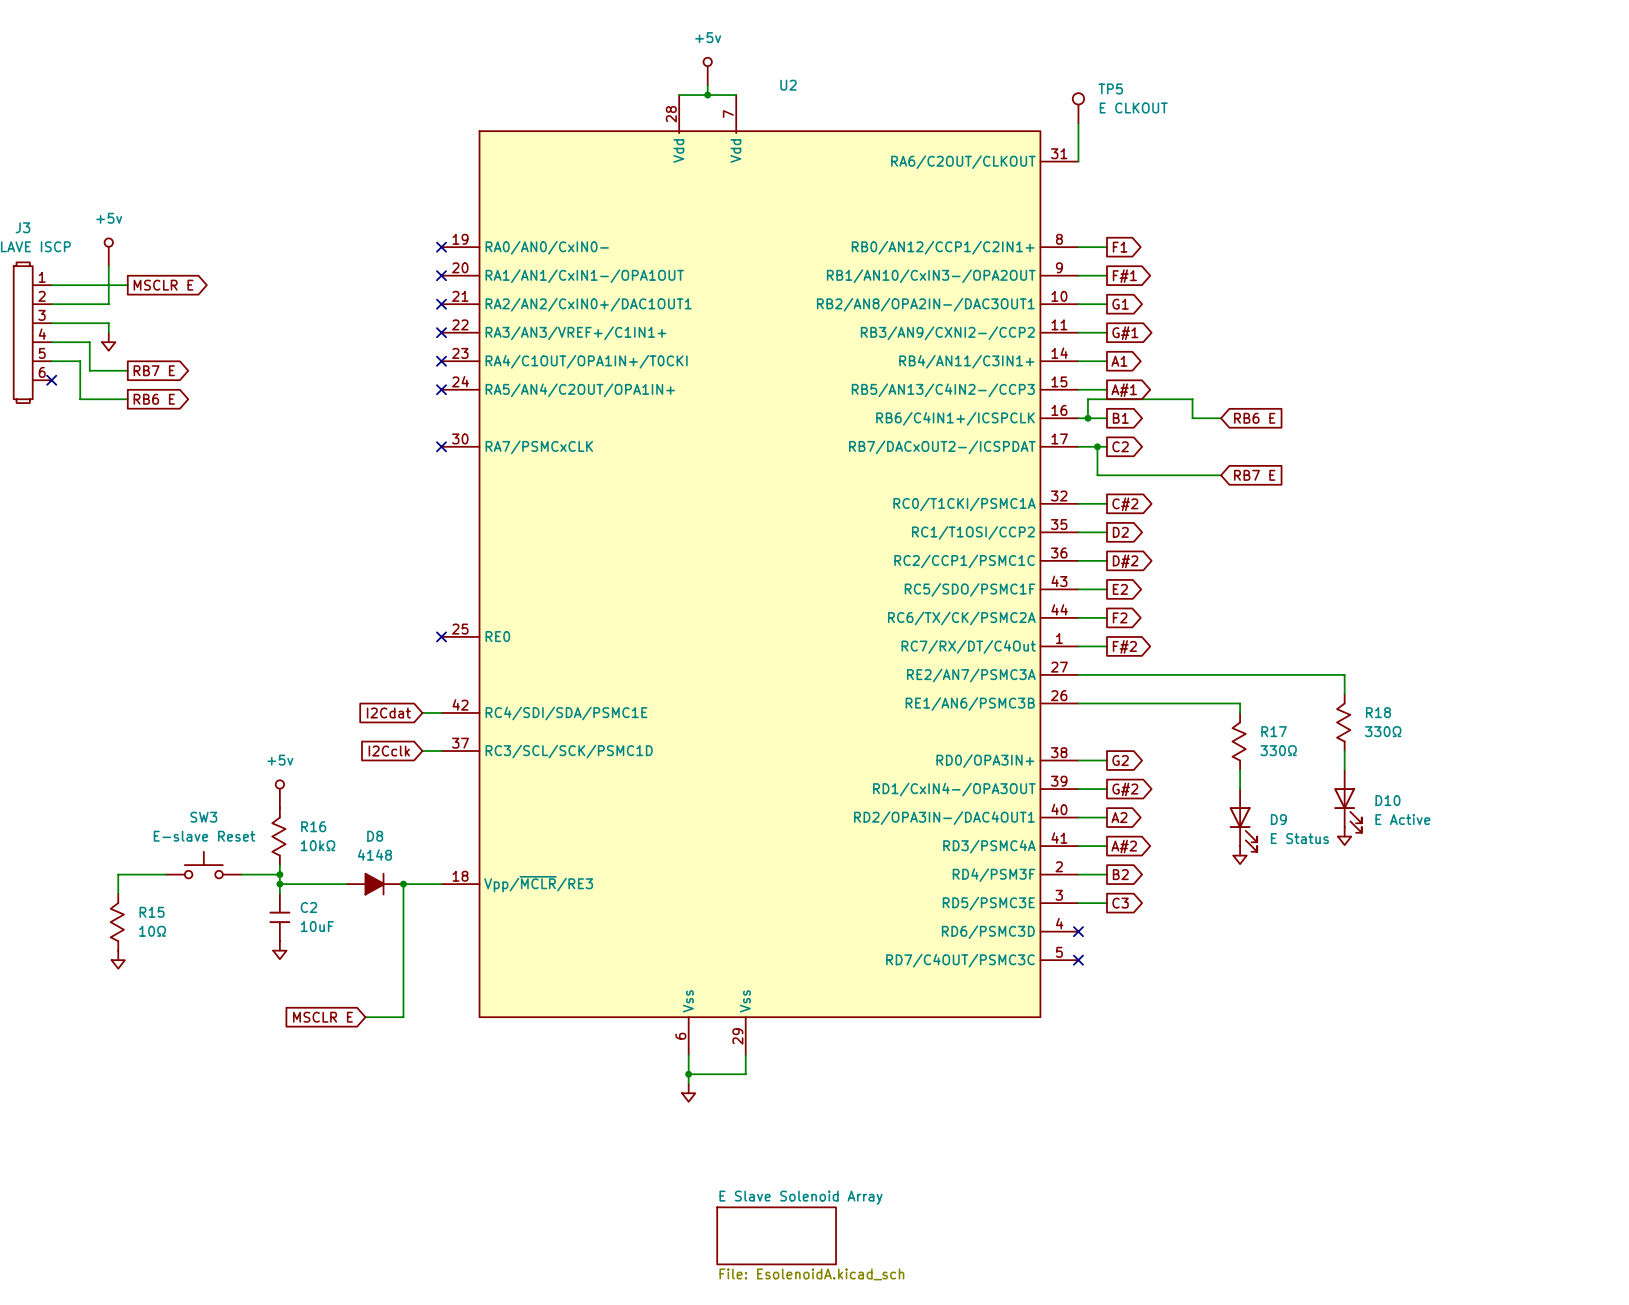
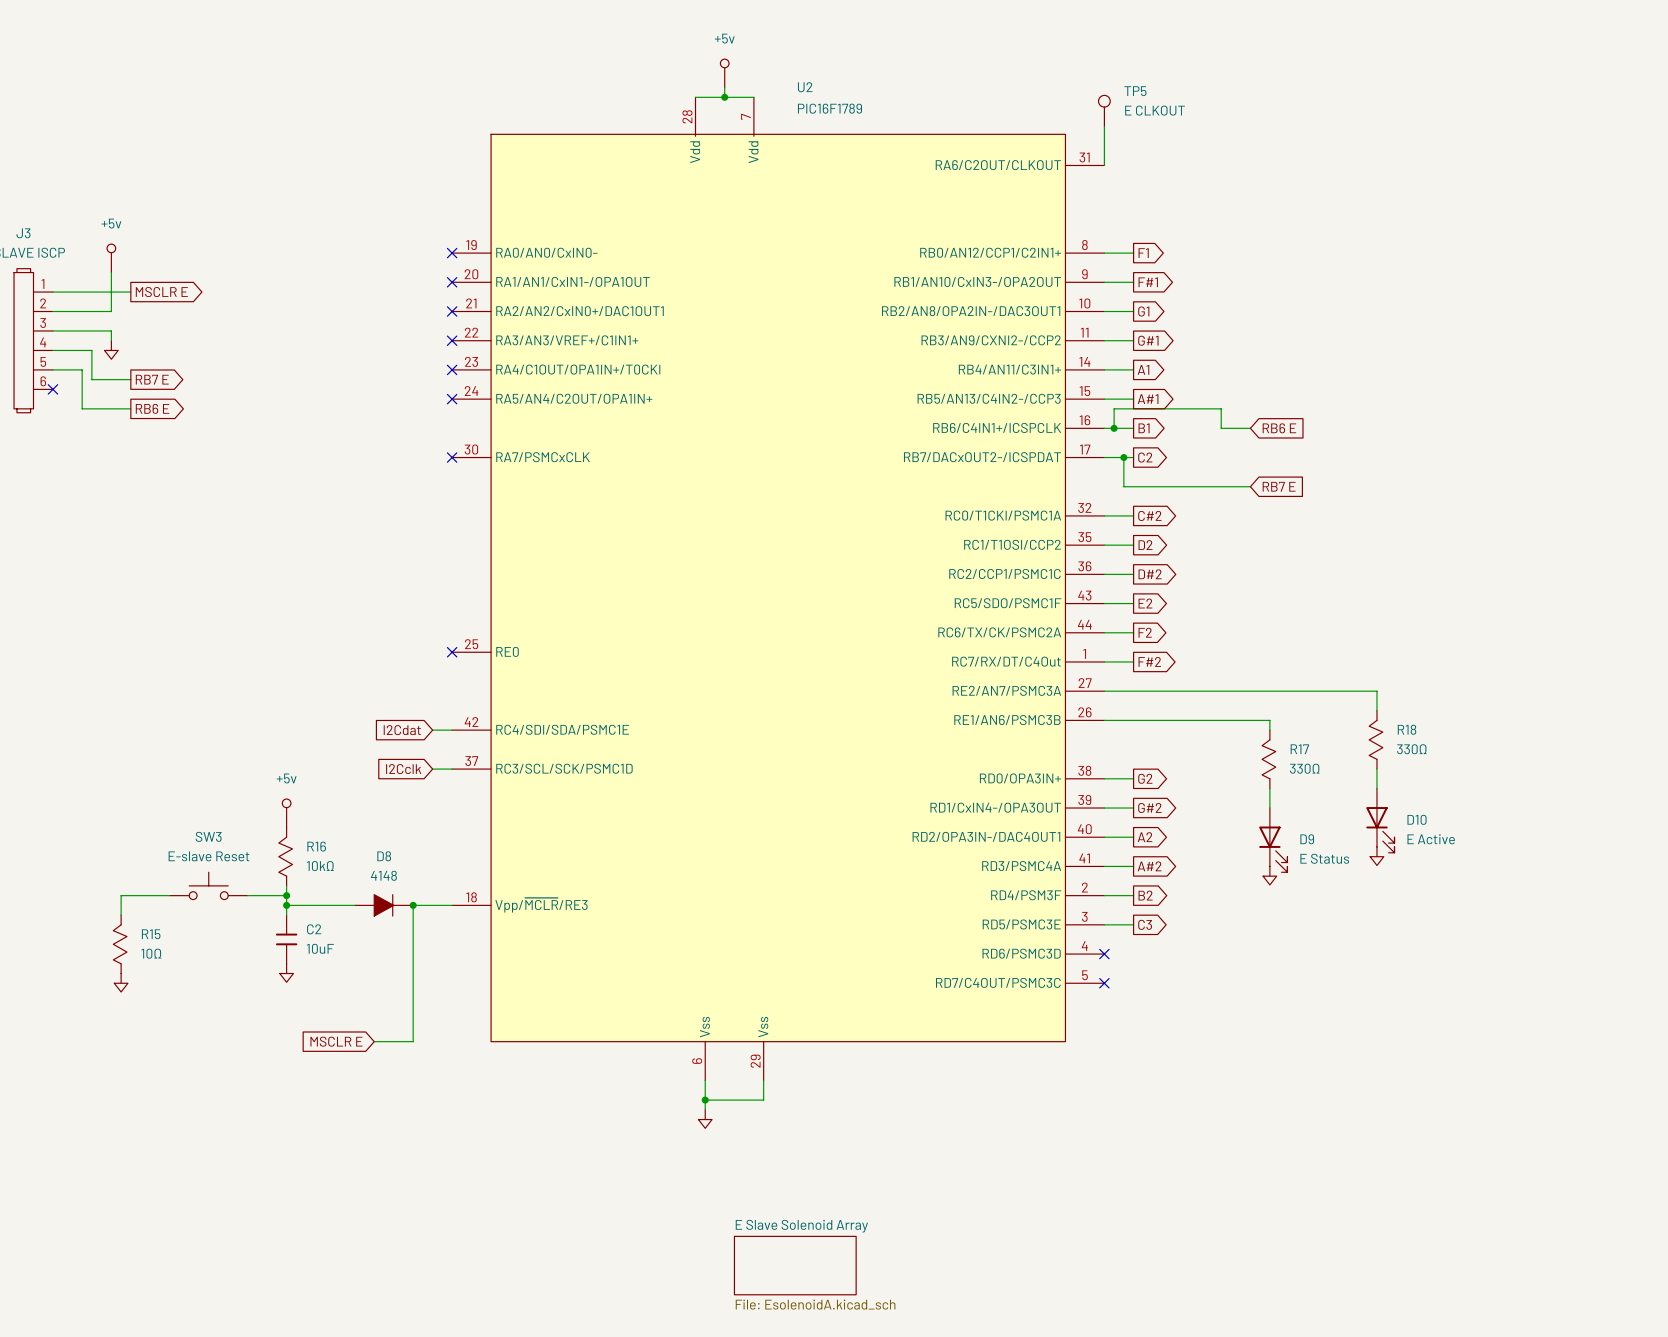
U2 value: none -> PIC16F1789 (829, 108)

